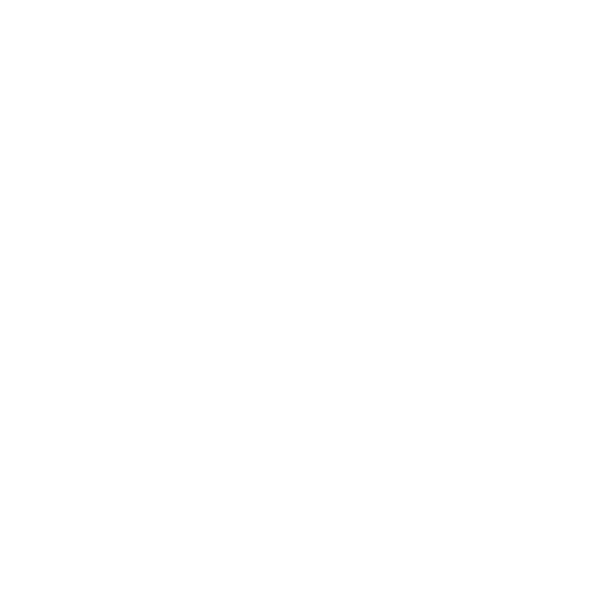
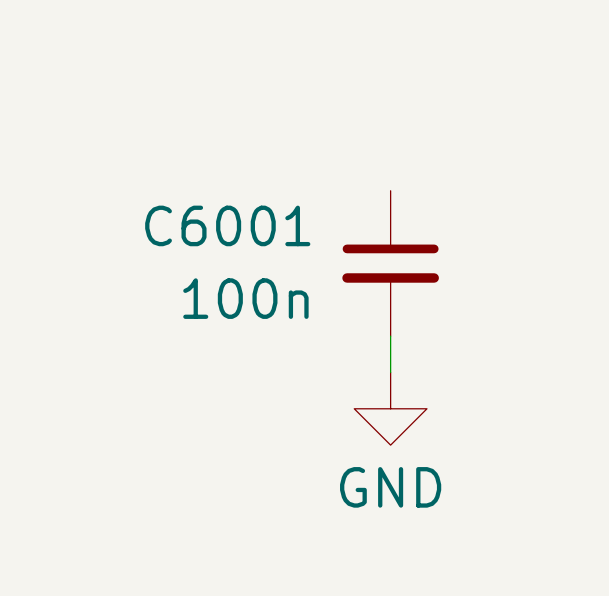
C6001: none -> (390, 263)
wire: none -> (390, 336) (390, 372)
power symbol: none -> GND (390, 408)

